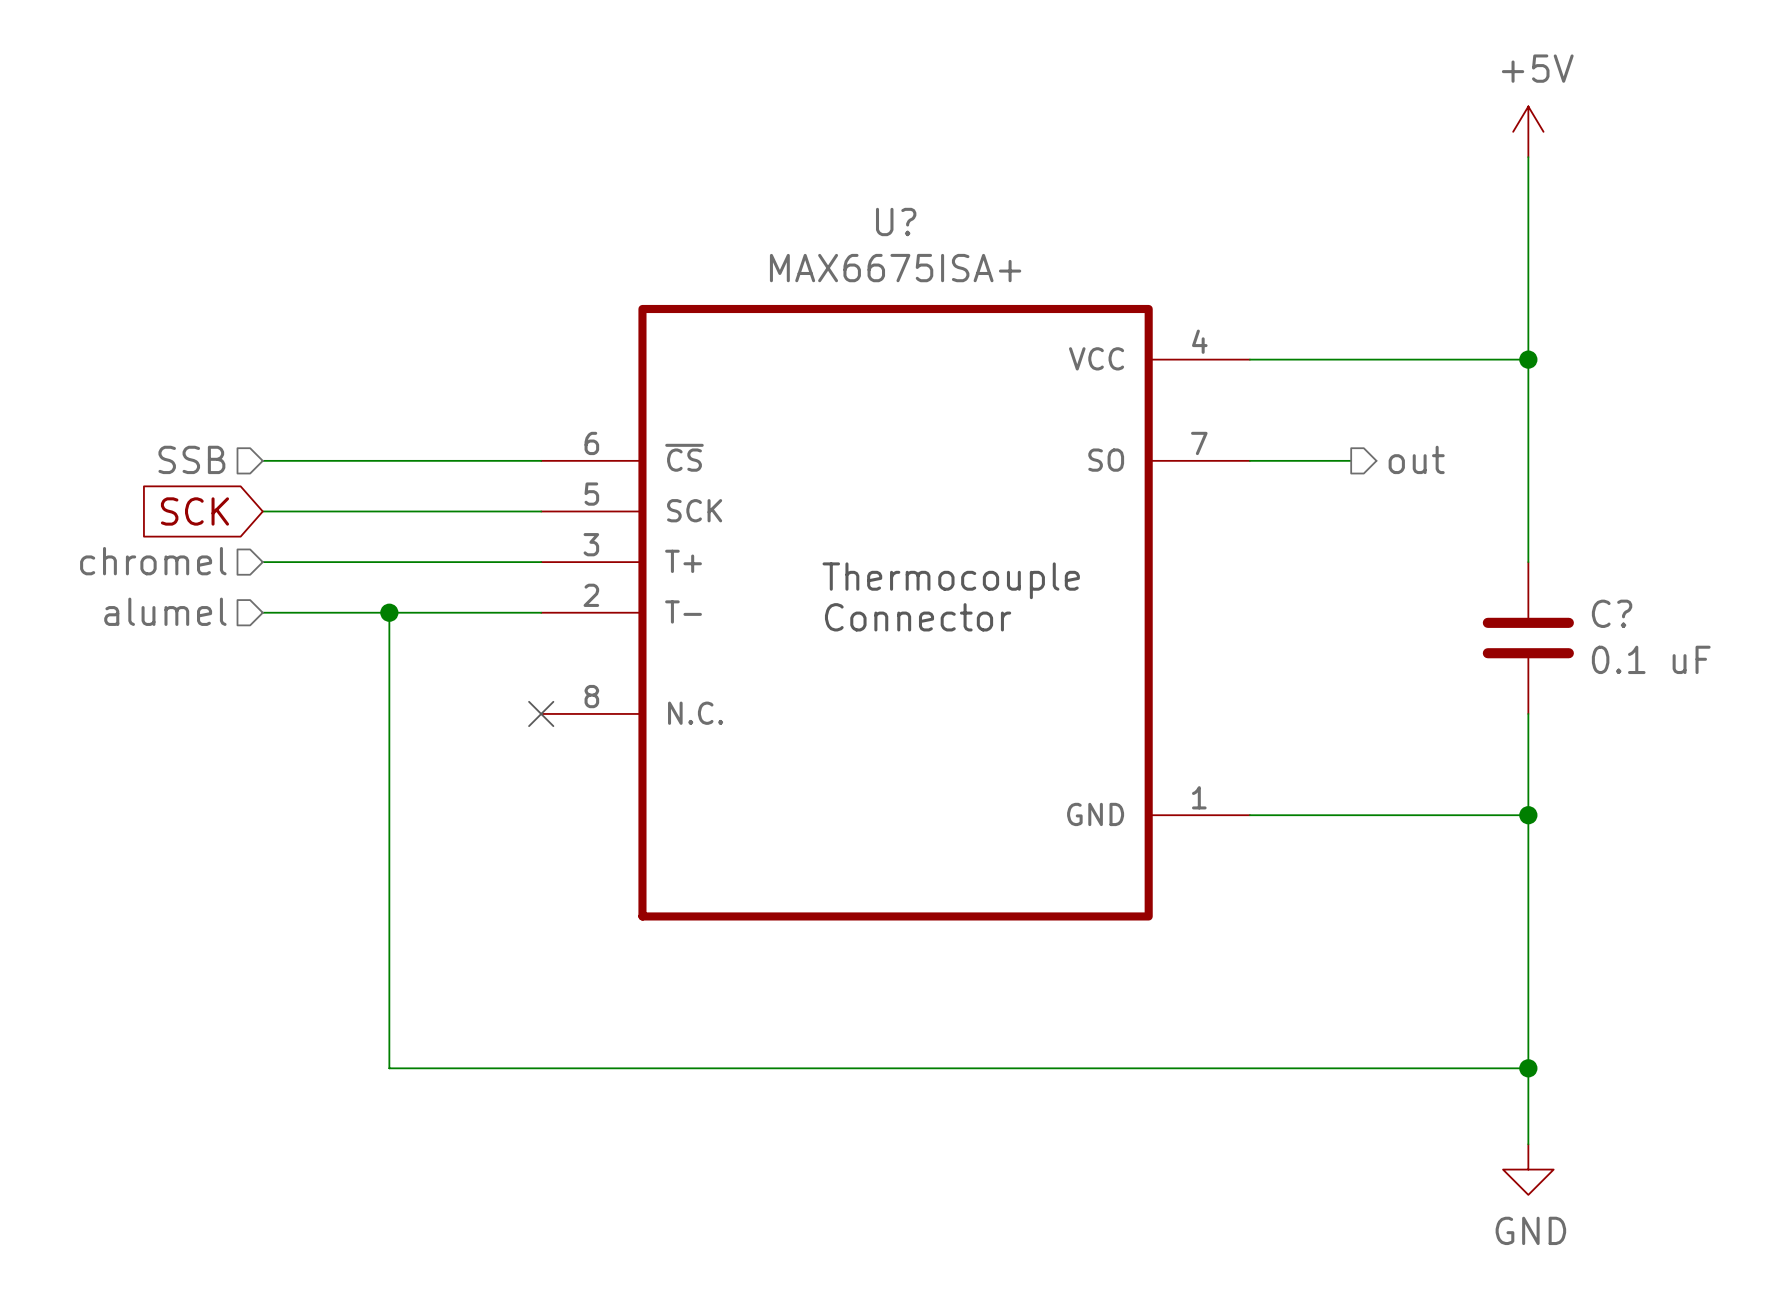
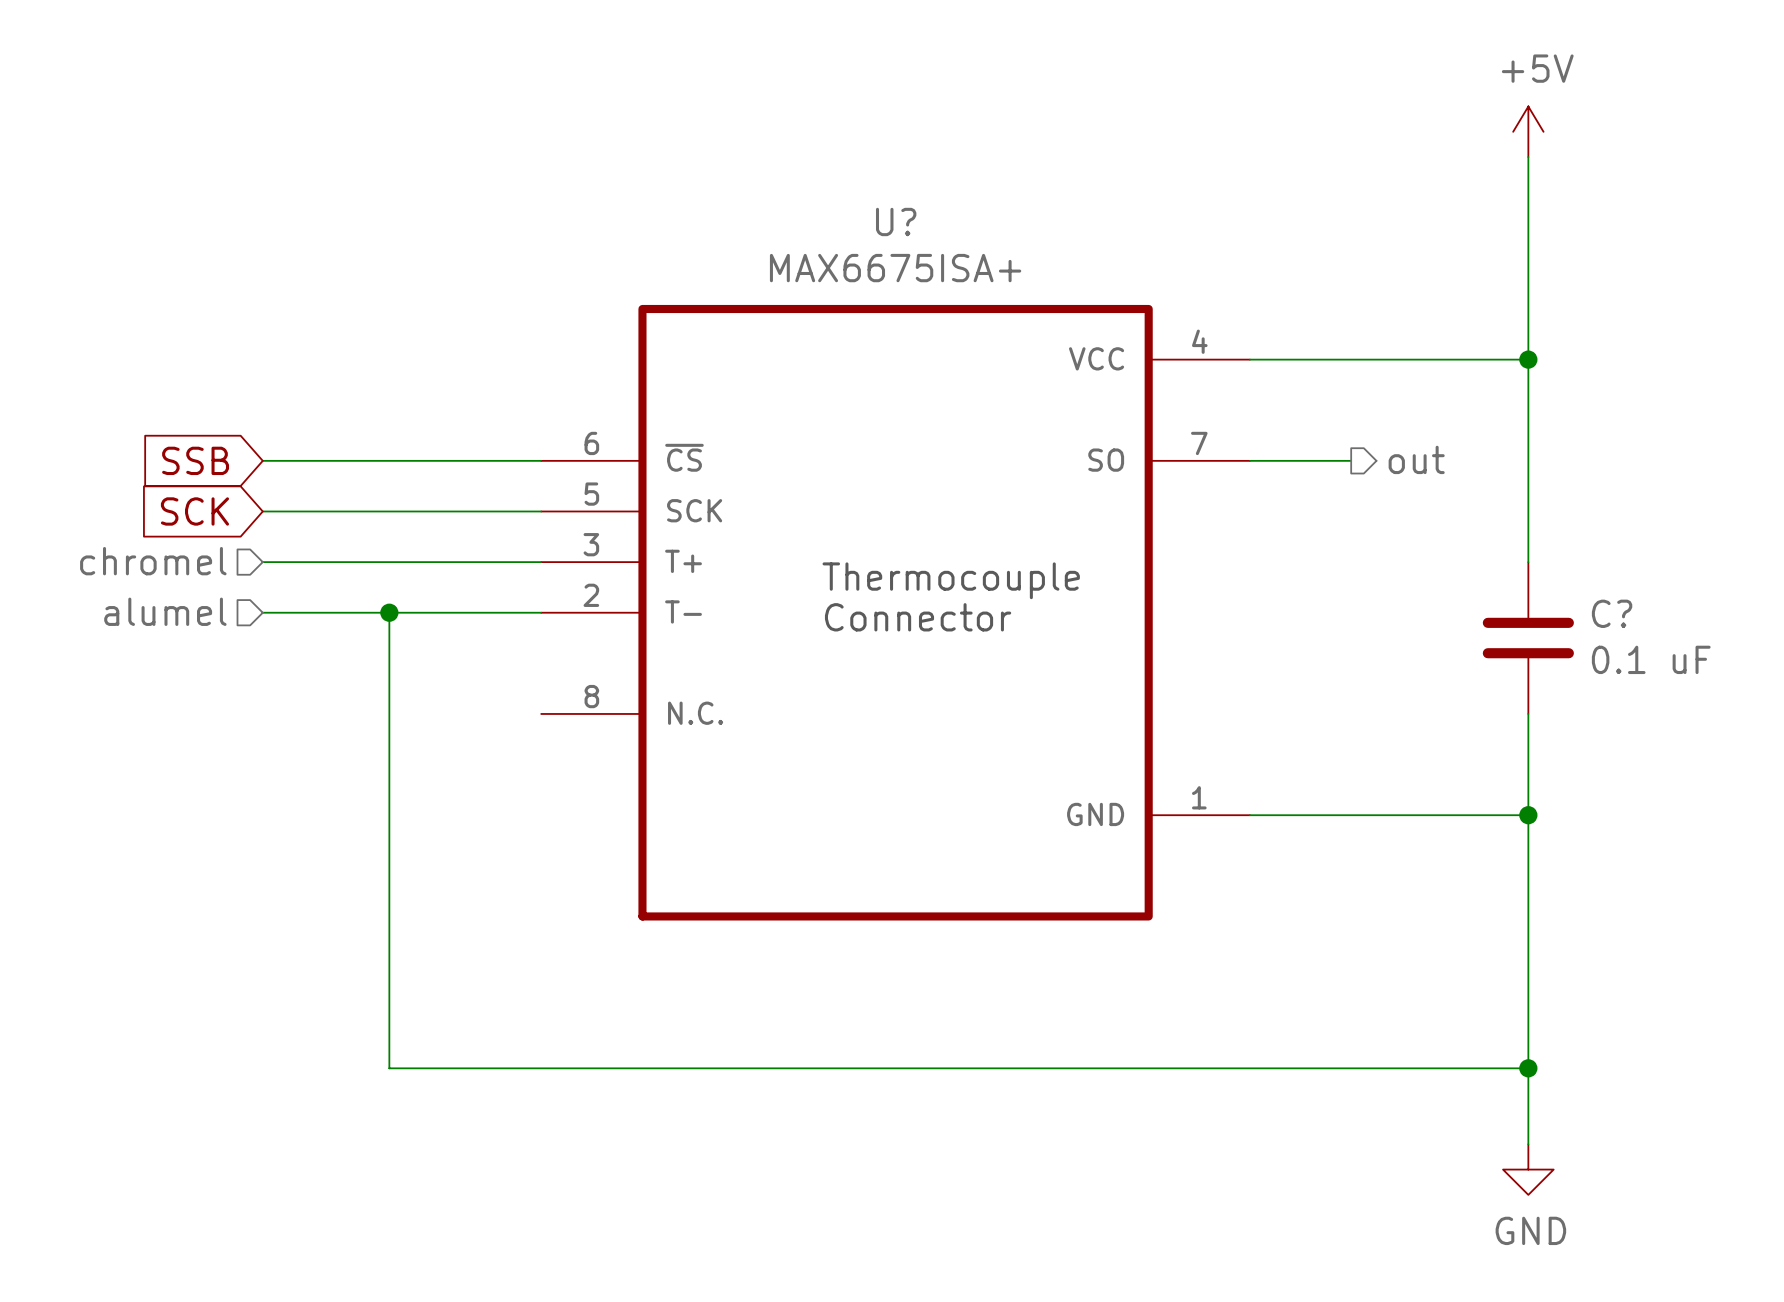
hierarchical label: SSB (191, 459) -> none
global label: none -> SSB (195, 460)
no-connect mark: (541, 713) -> none

